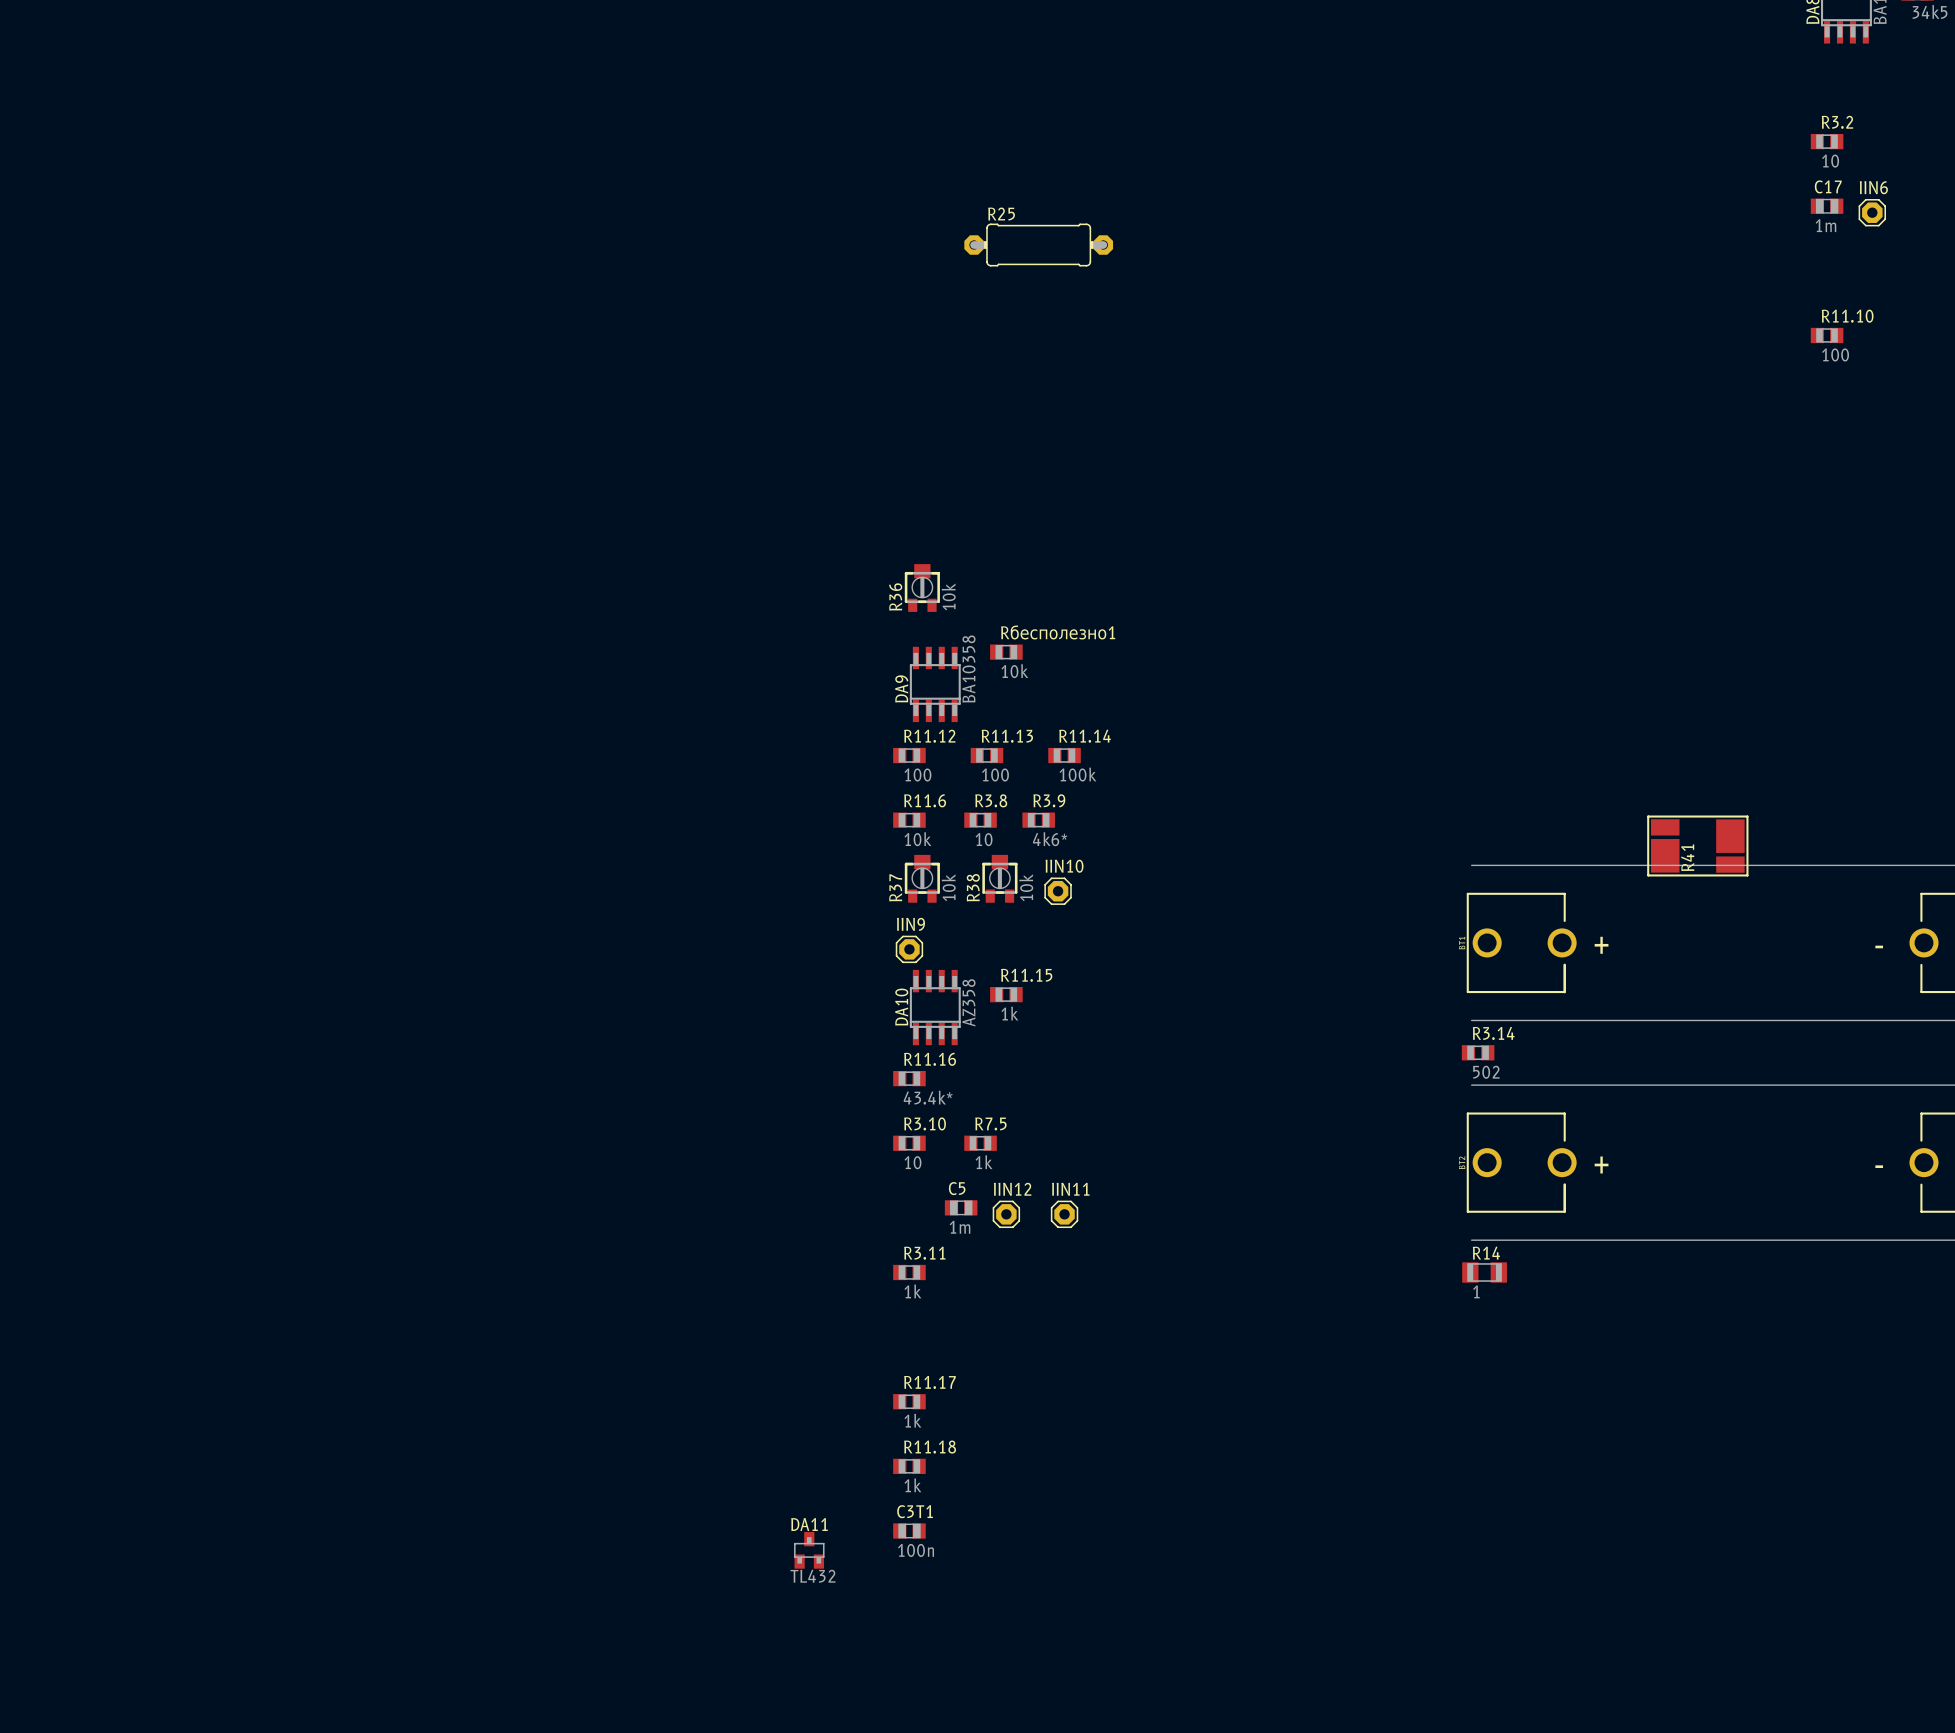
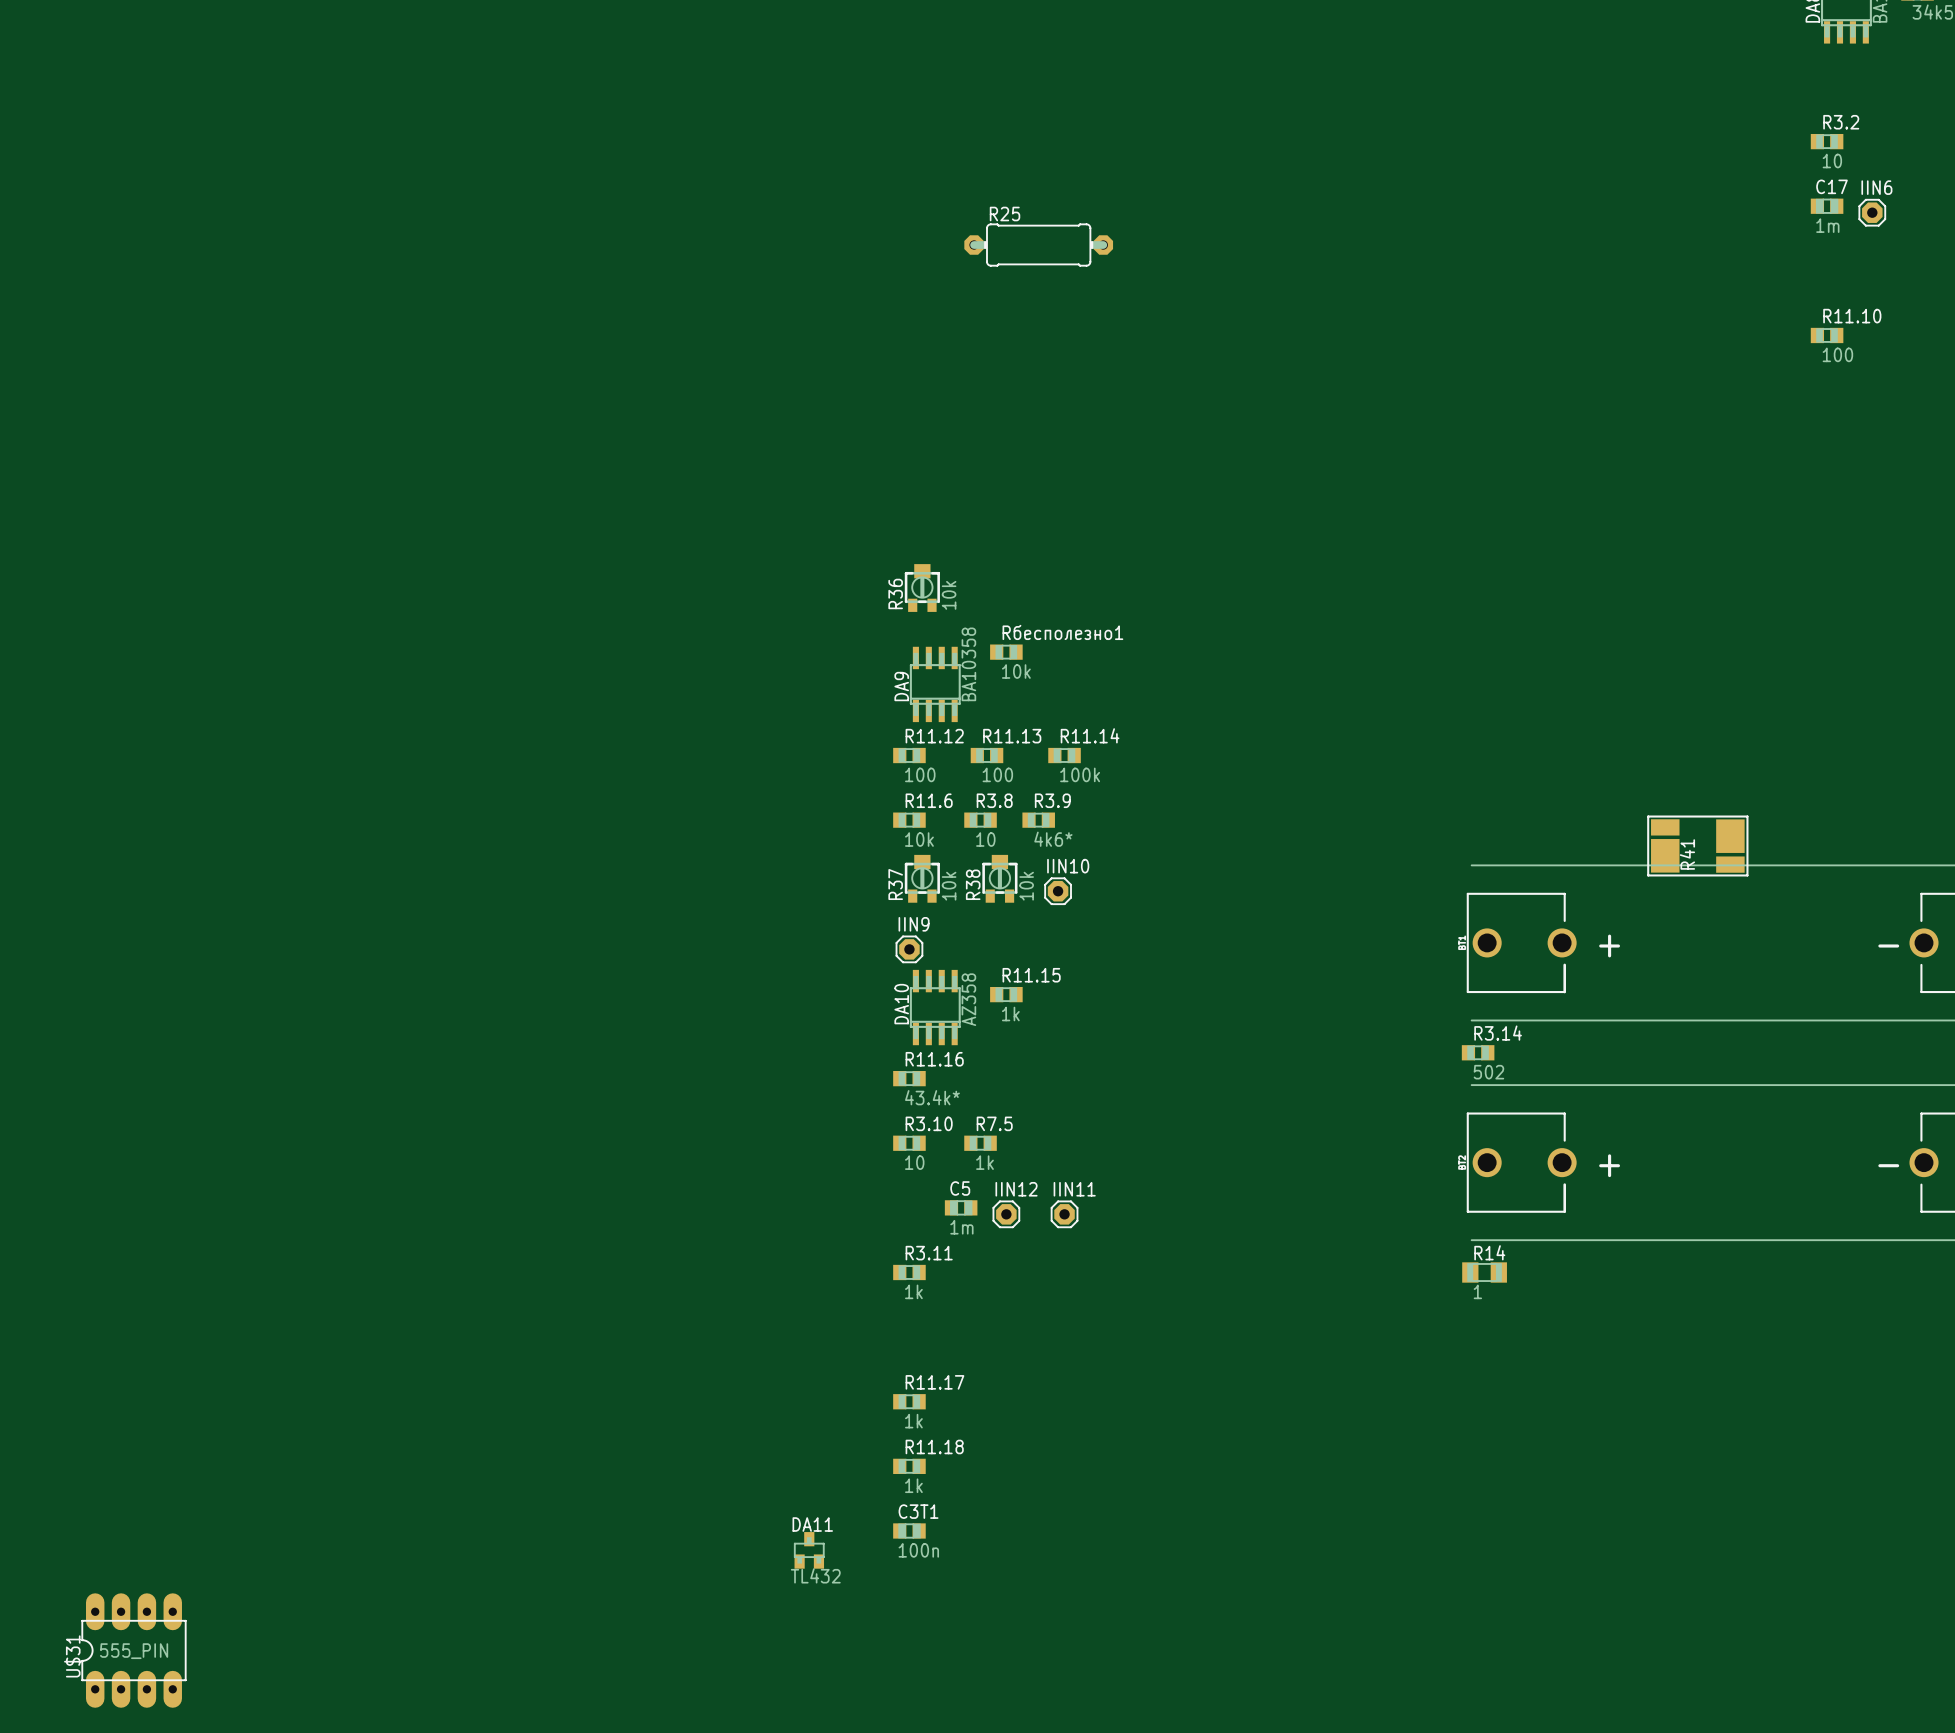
U$31: none -> 555_PIN (133, 1650)

